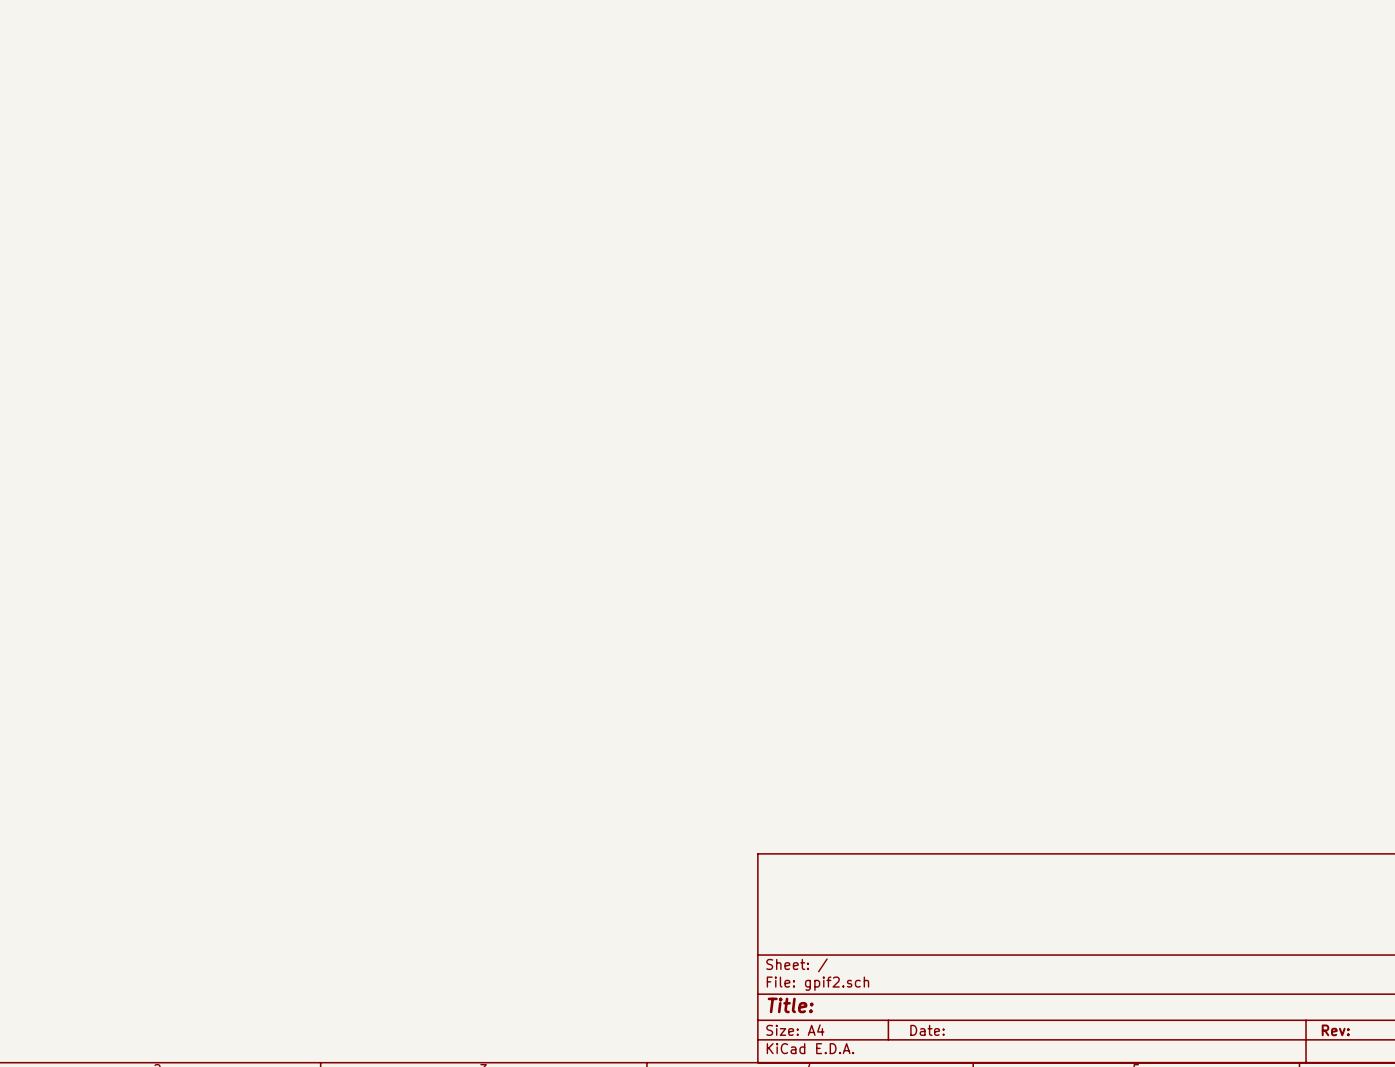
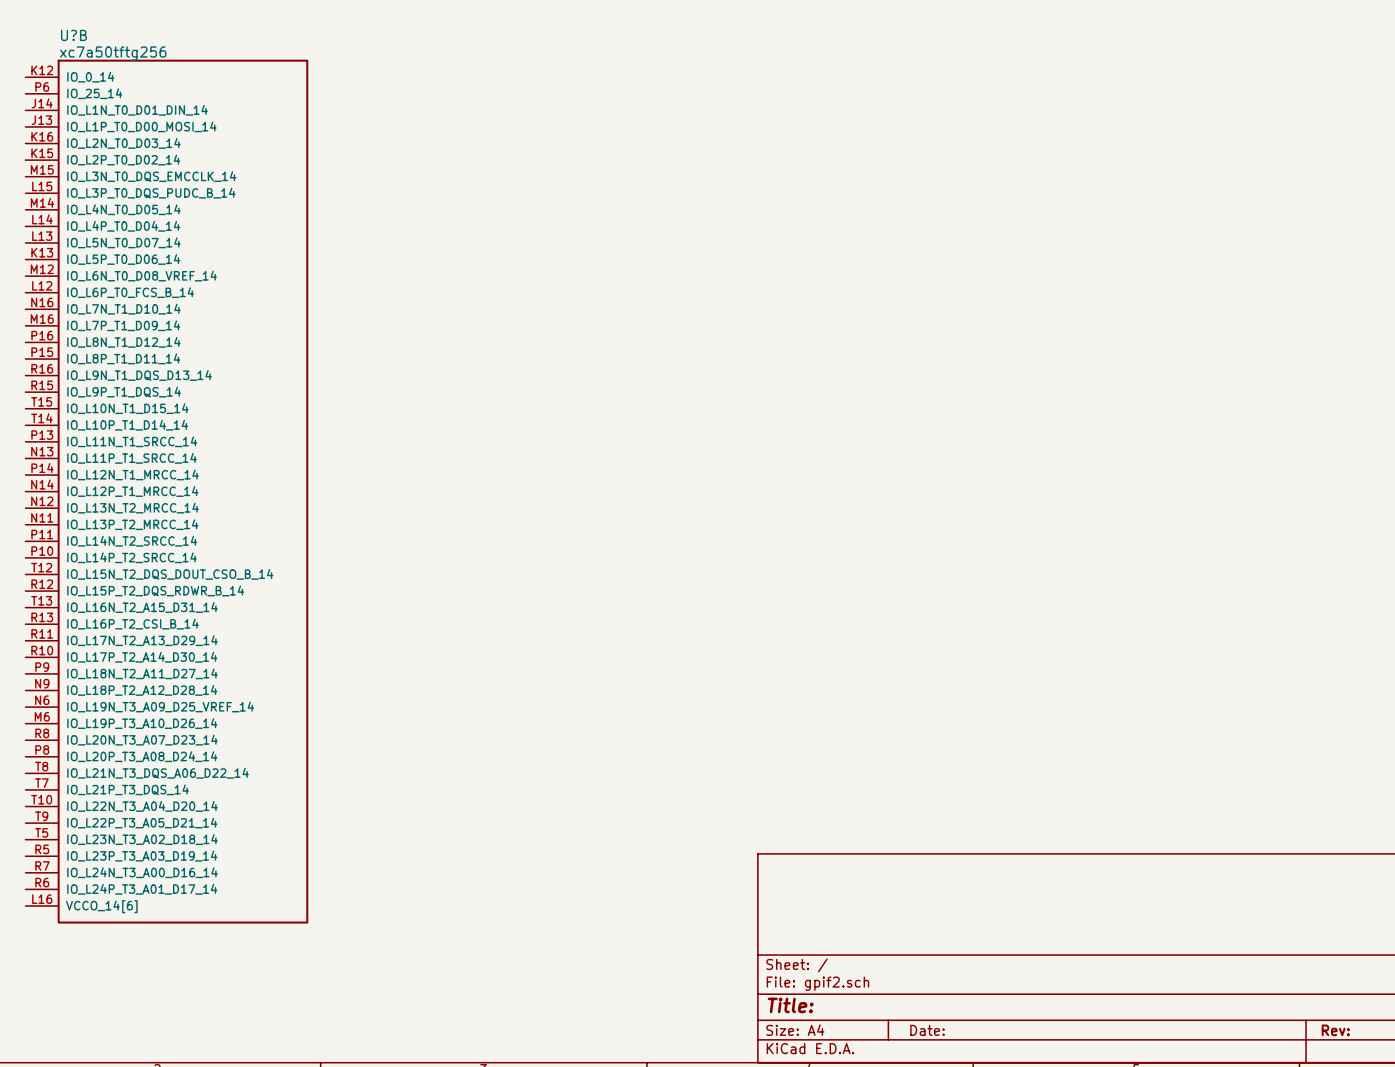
U?B: none -> xc7a50tftg256 (166, 491)

